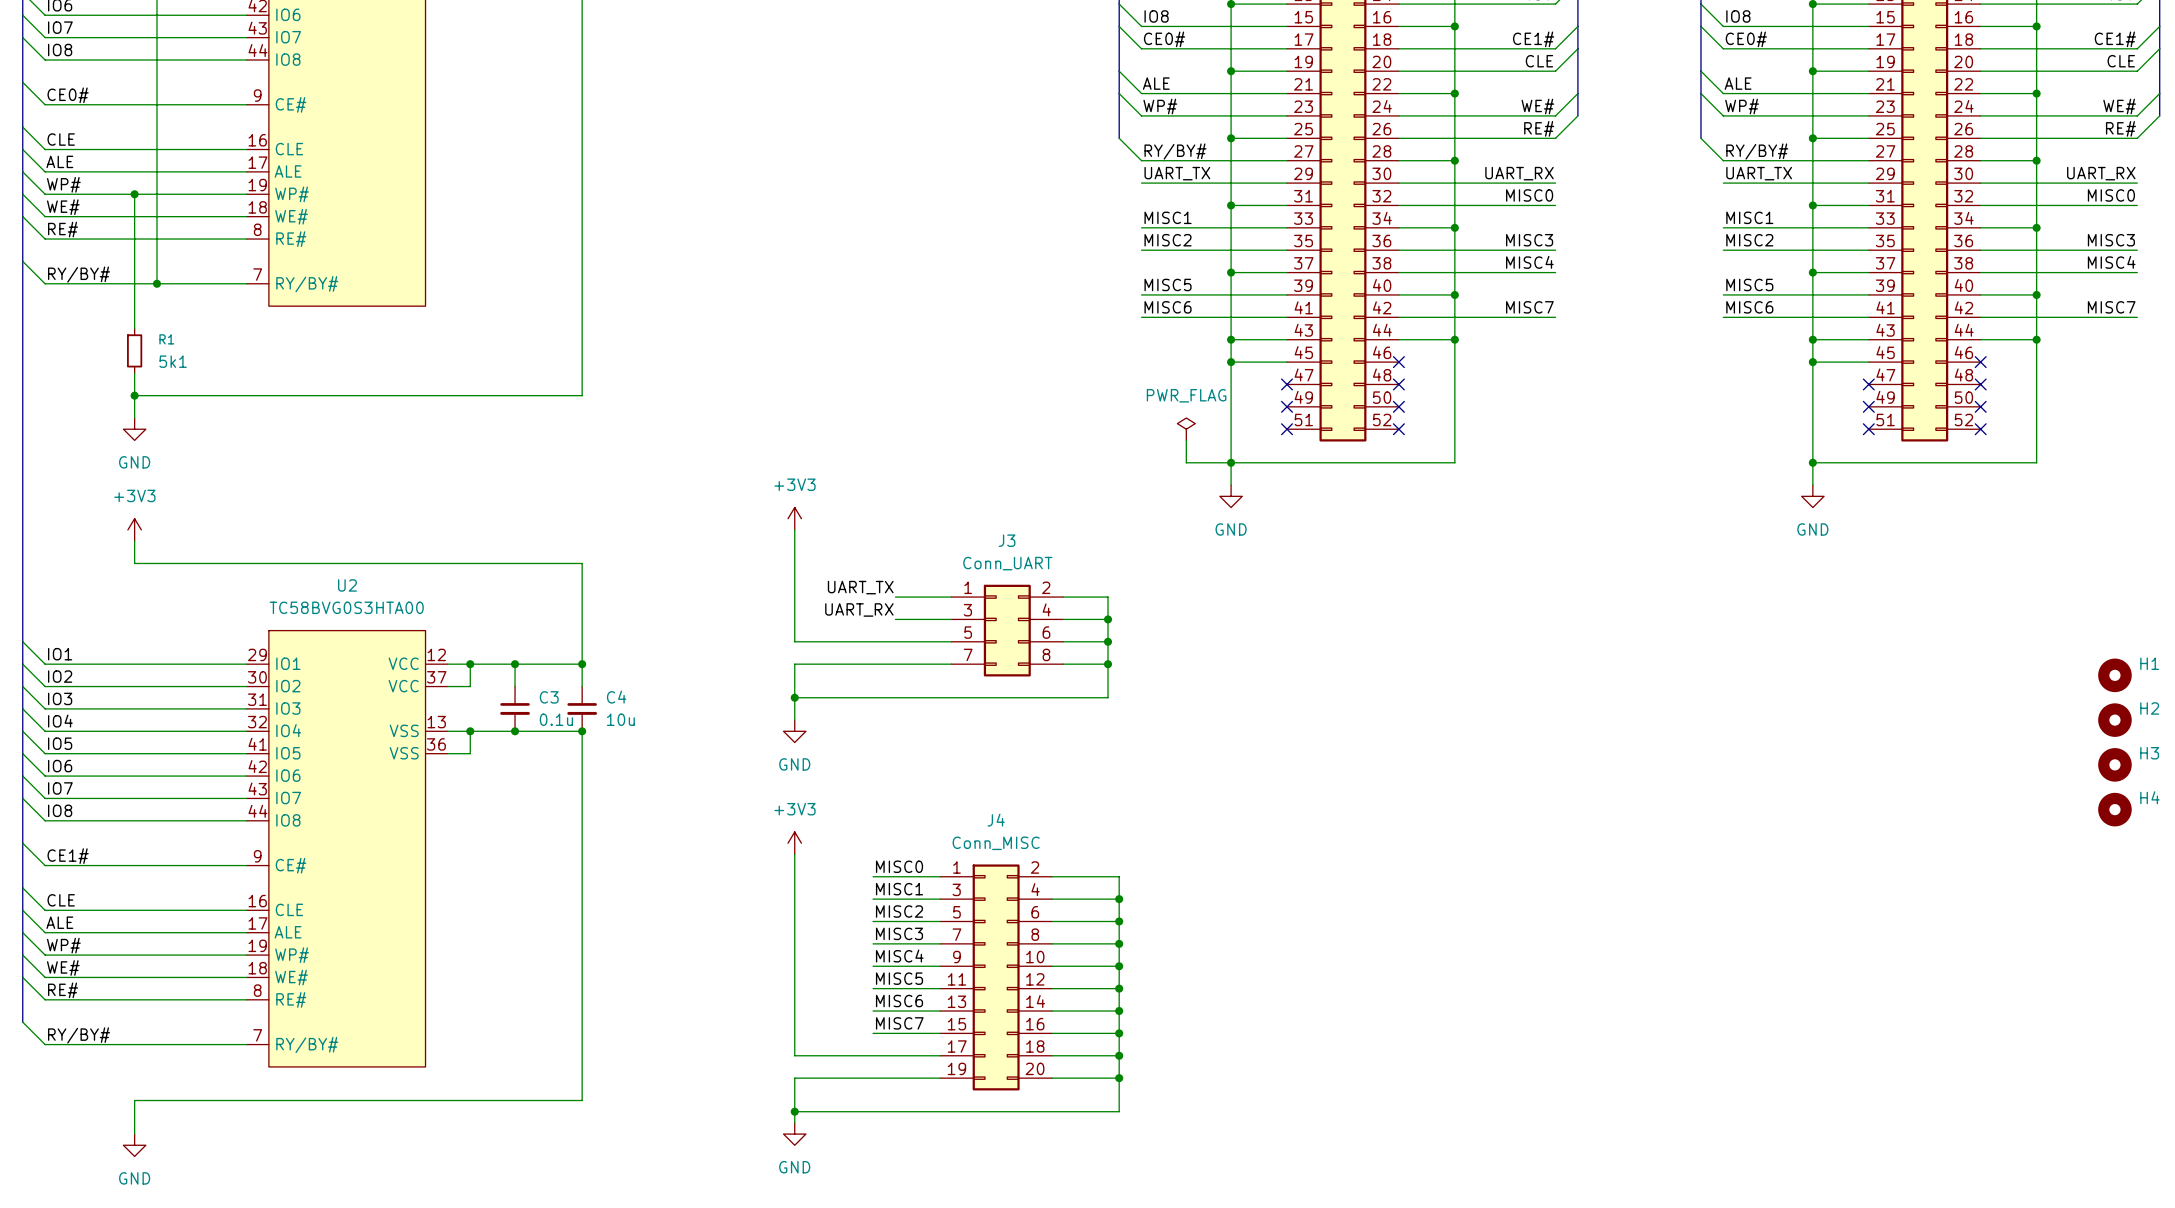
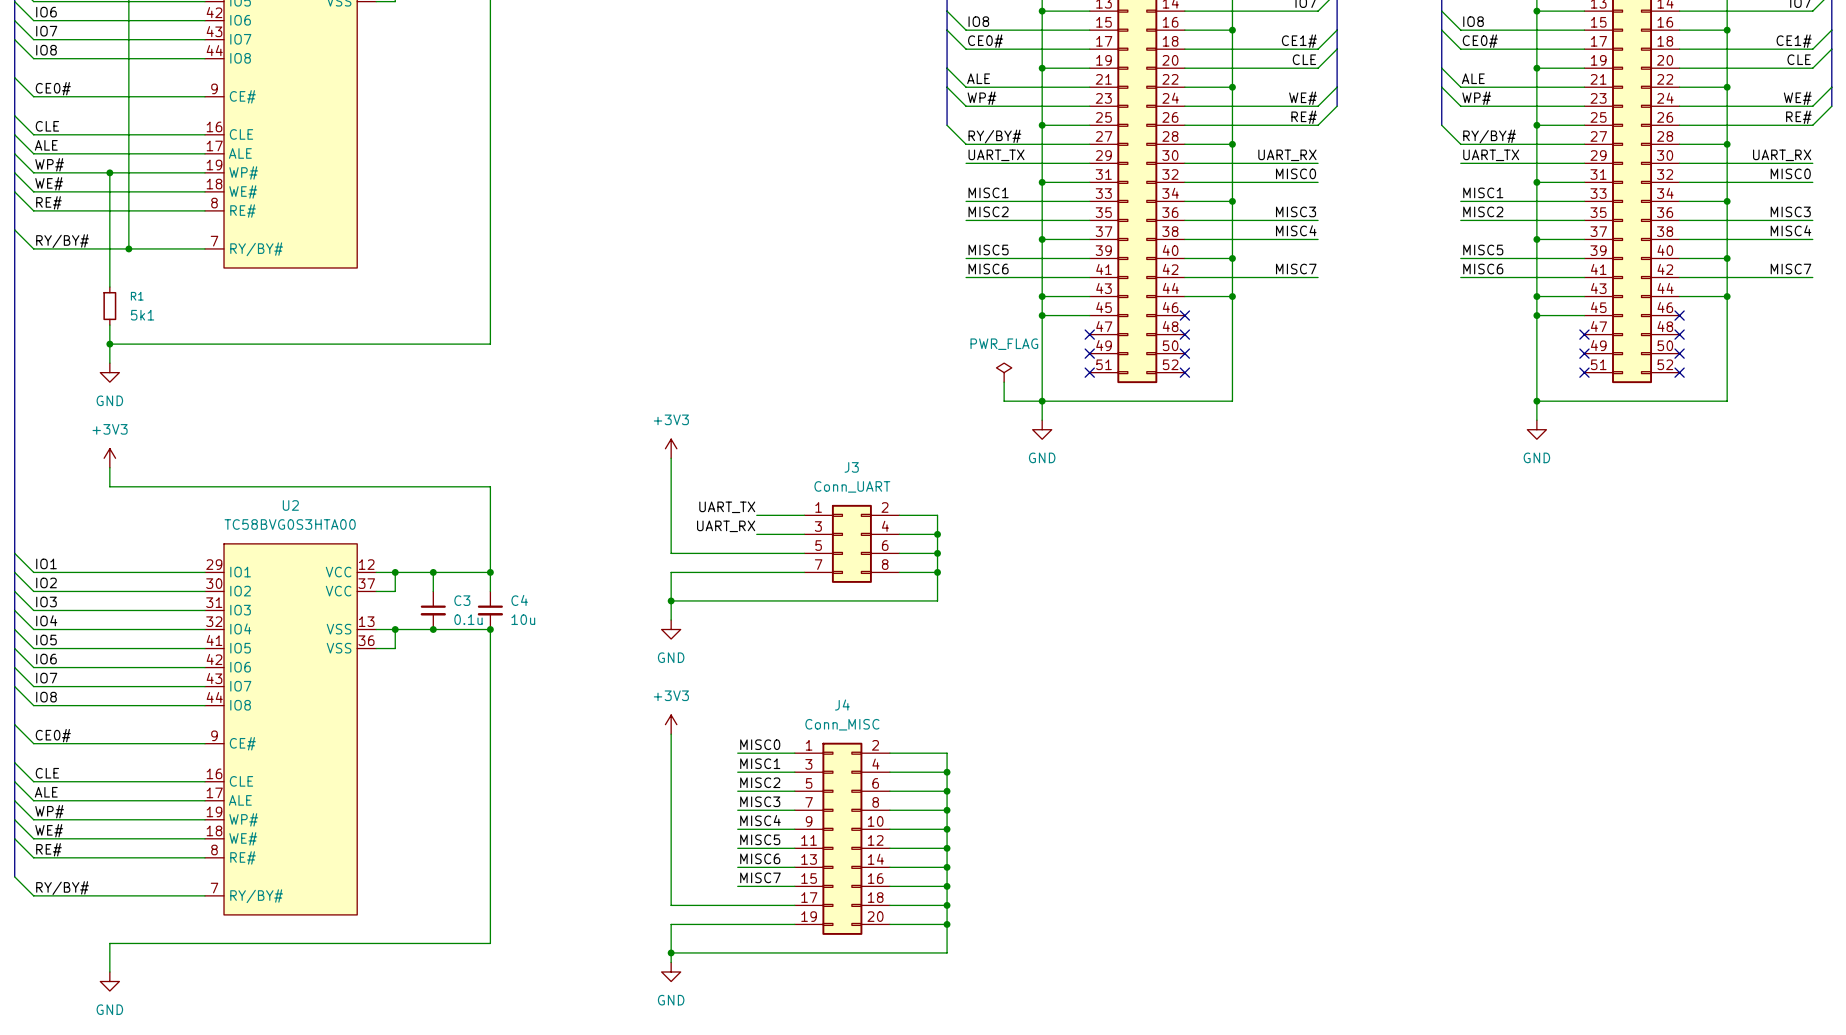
H1: (2114, 675) -> none
H2: (2114, 720) -> none
H3: (2114, 764) -> none
H4: (2114, 809) -> none
label: CE1# (68, 856) -> CE0# (53, 735)

